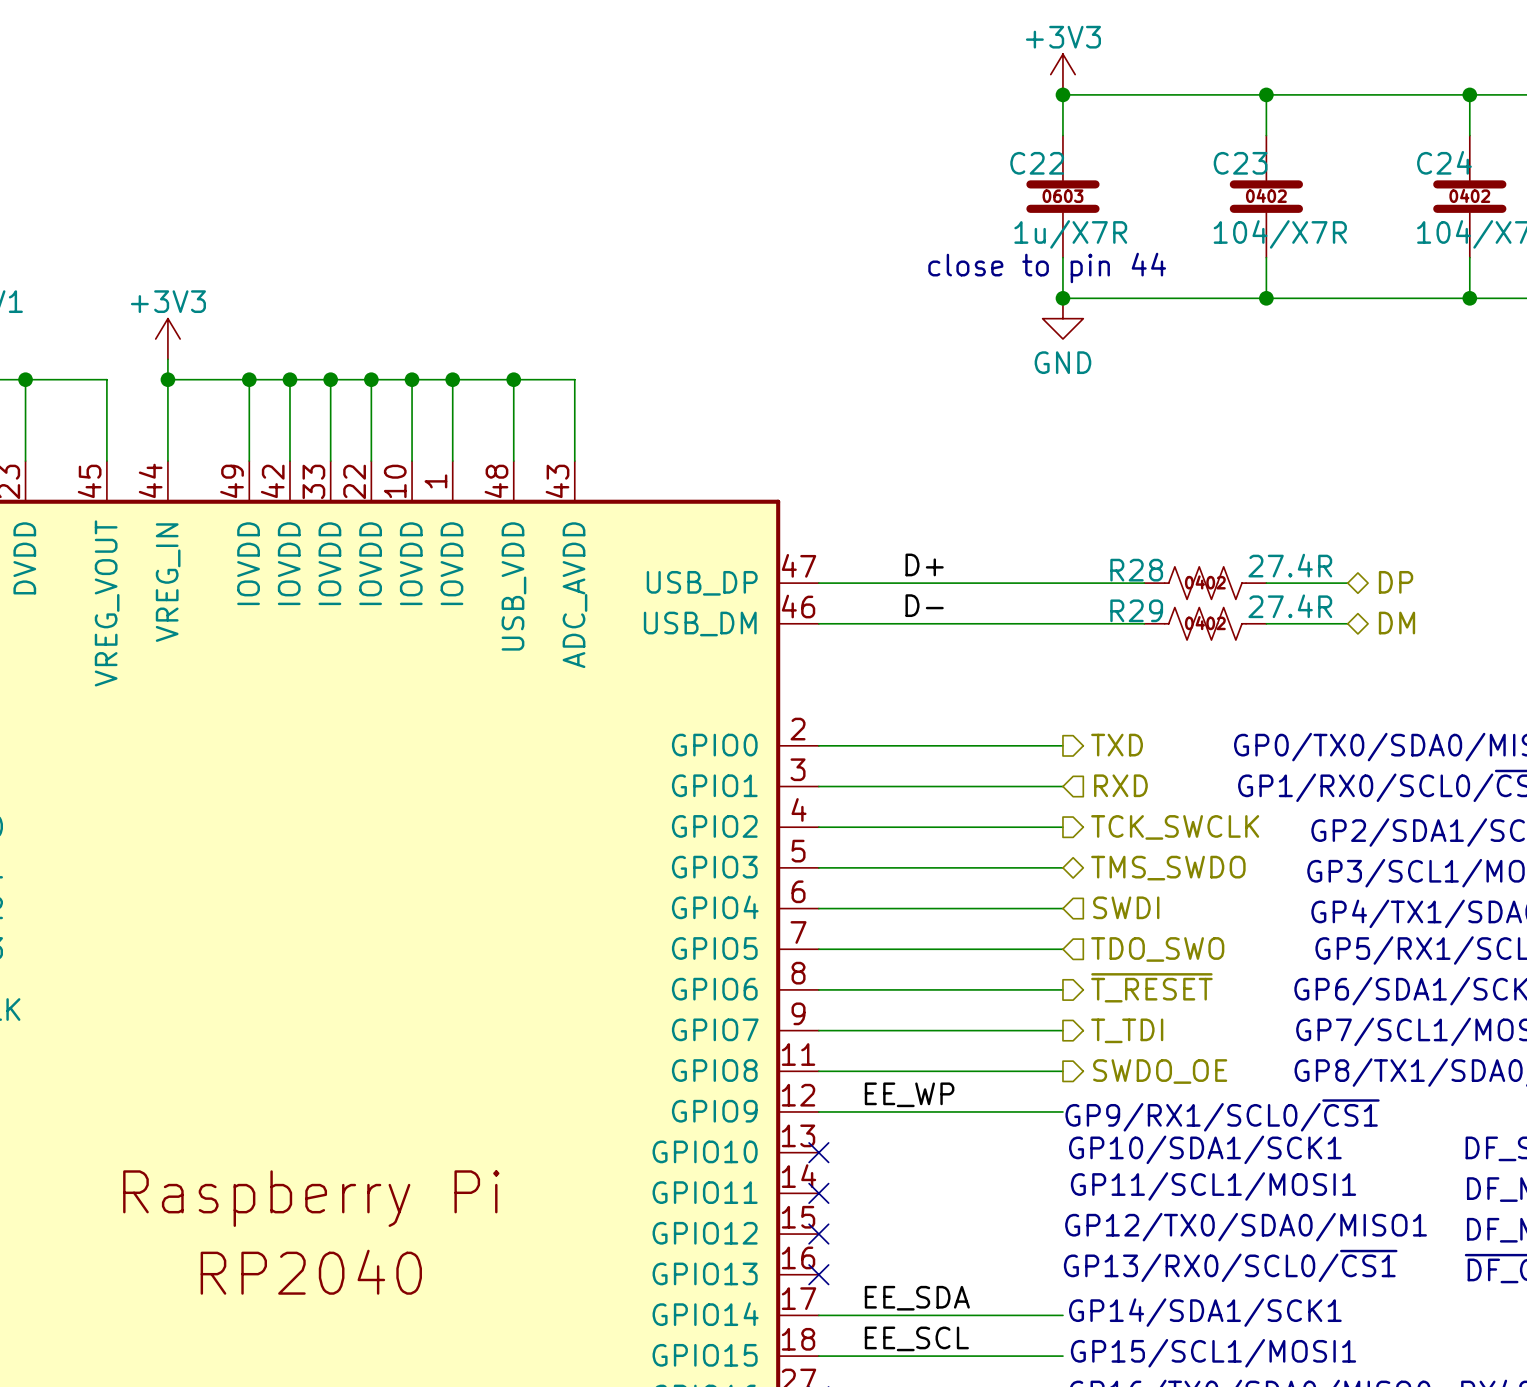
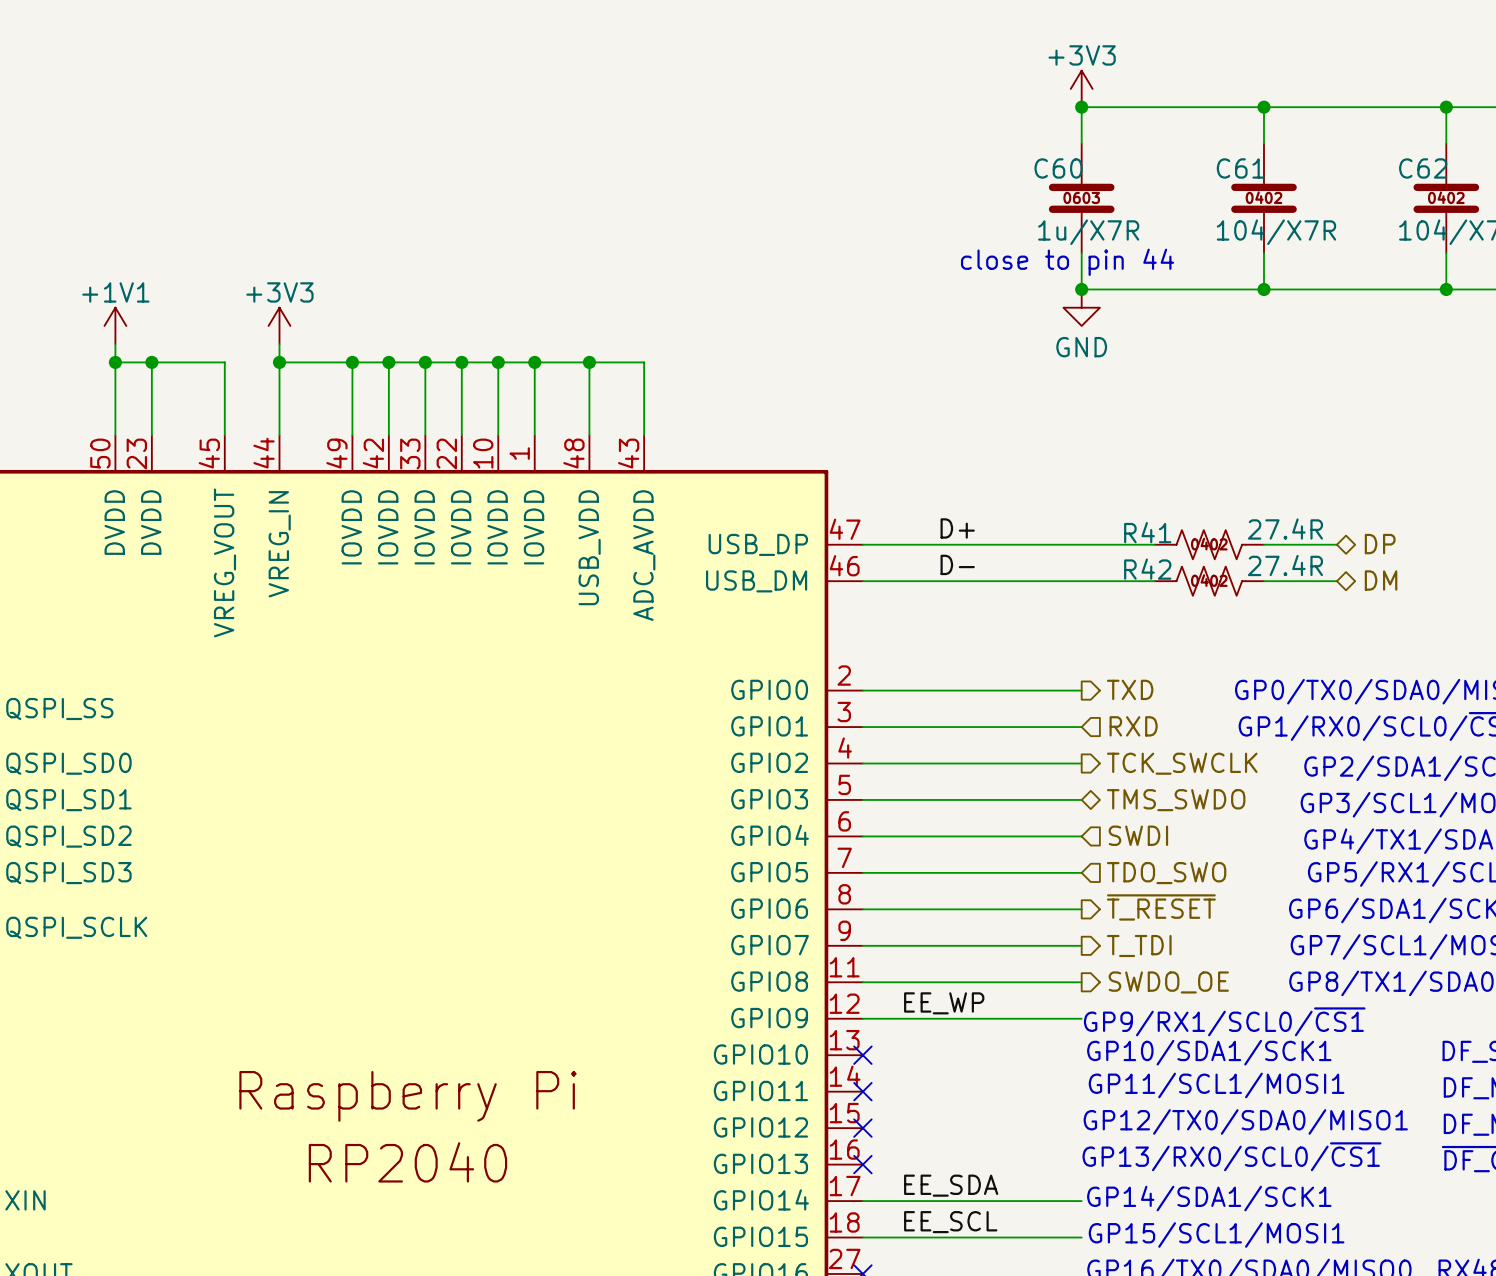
C24 name: C24 (1444, 162) -> C62 (1423, 168)
C22 name: C22 (1037, 163) -> C60 (1058, 168)
C23 name: C23 (1240, 163) -> C61 (1240, 168)
R28 name: R28 (1136, 570) -> R41 (1147, 532)
R29 name: R29 (1136, 610) -> R42 (1147, 569)

